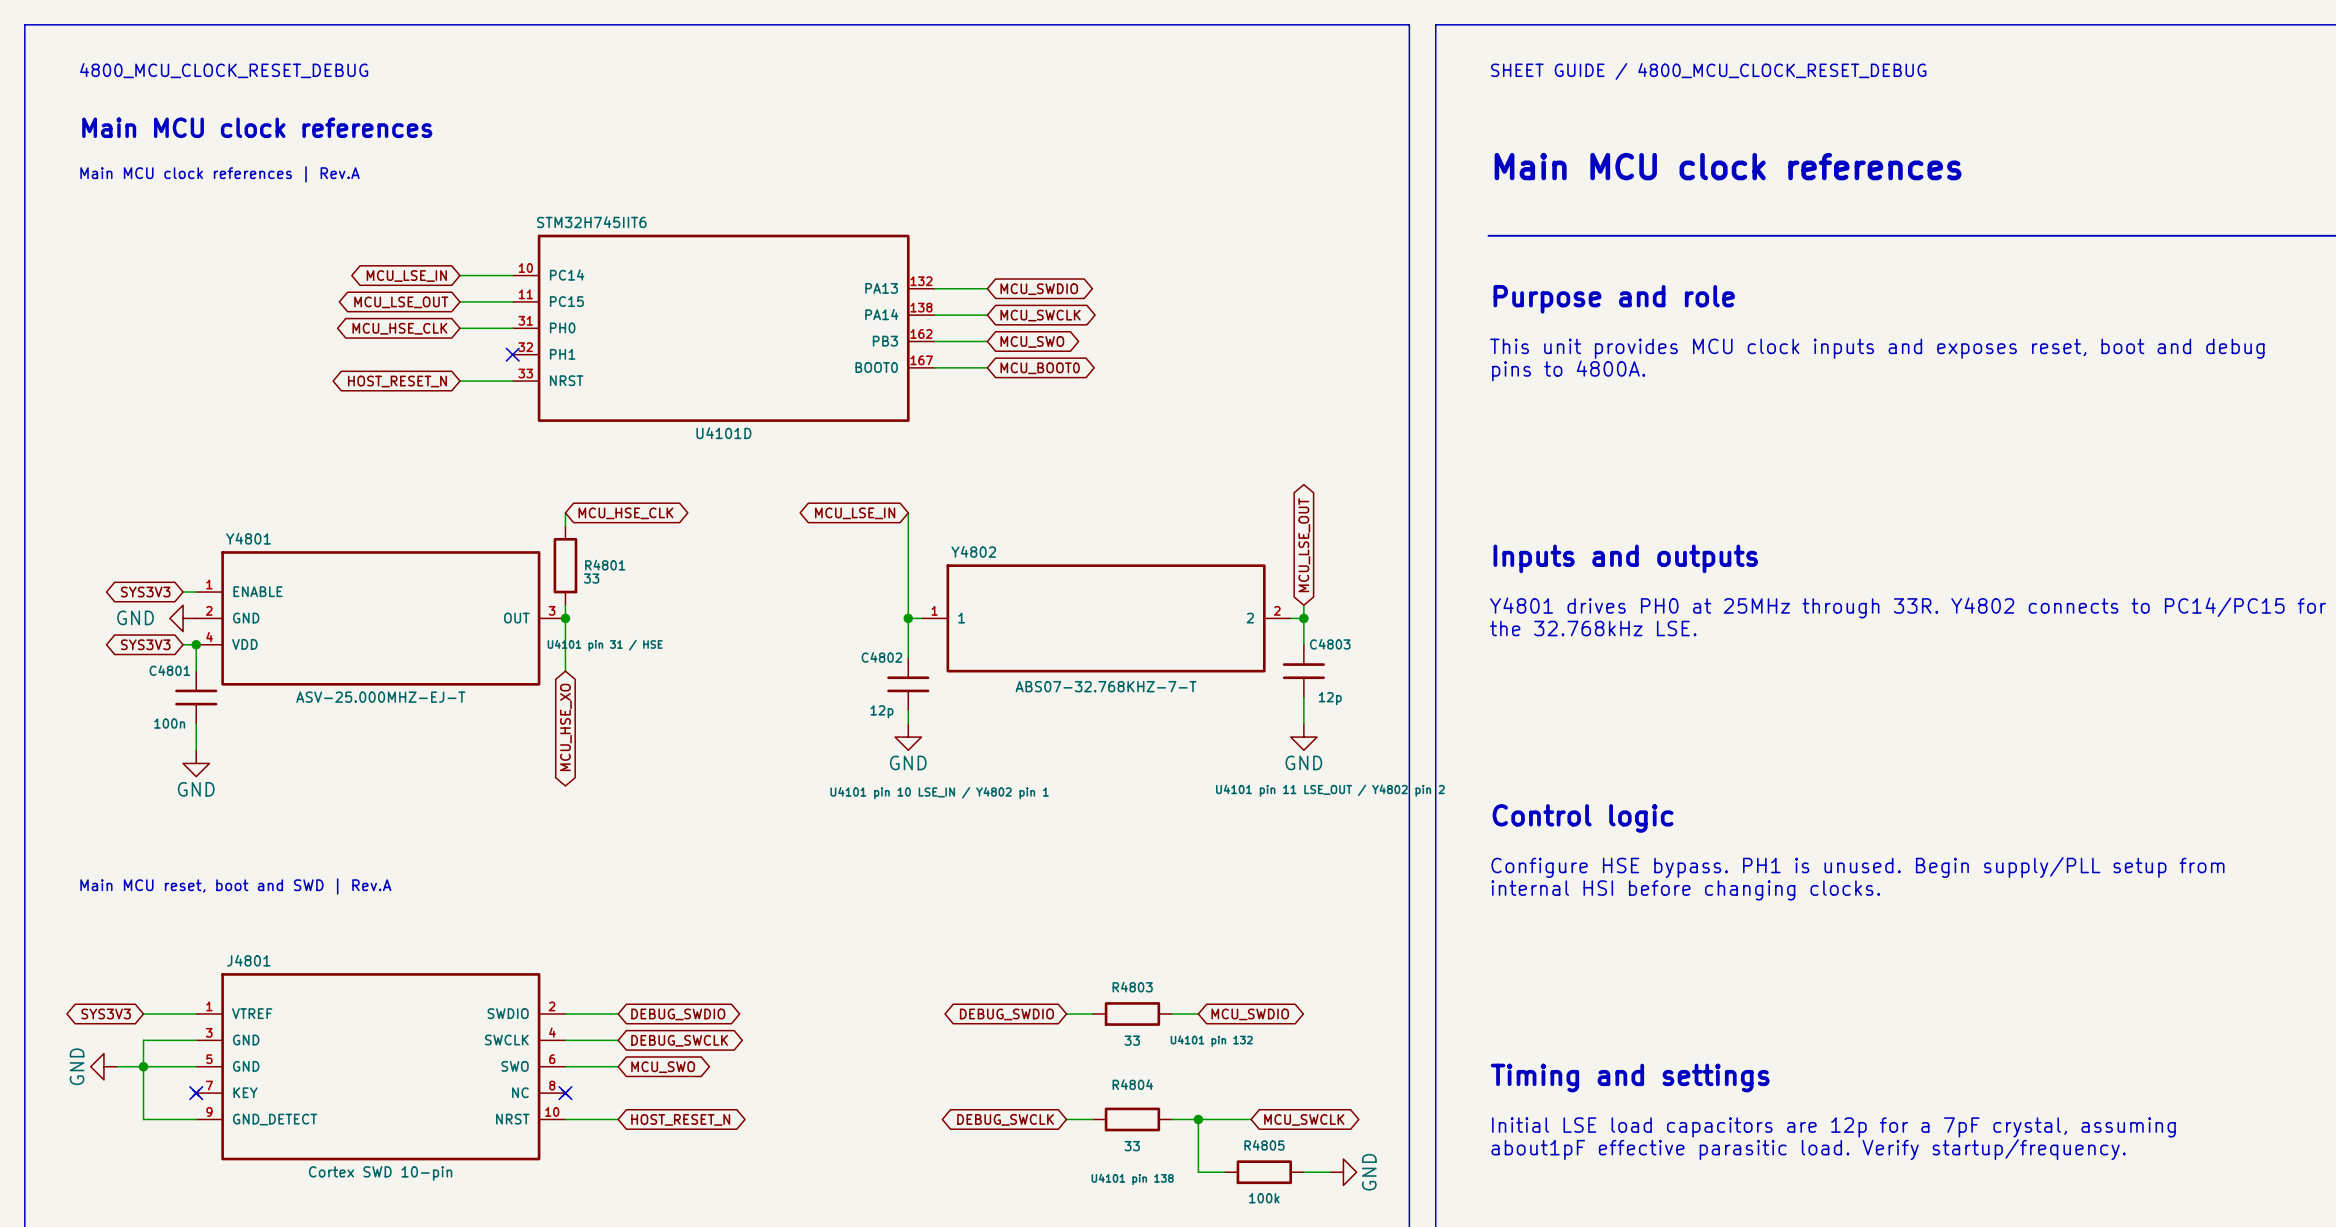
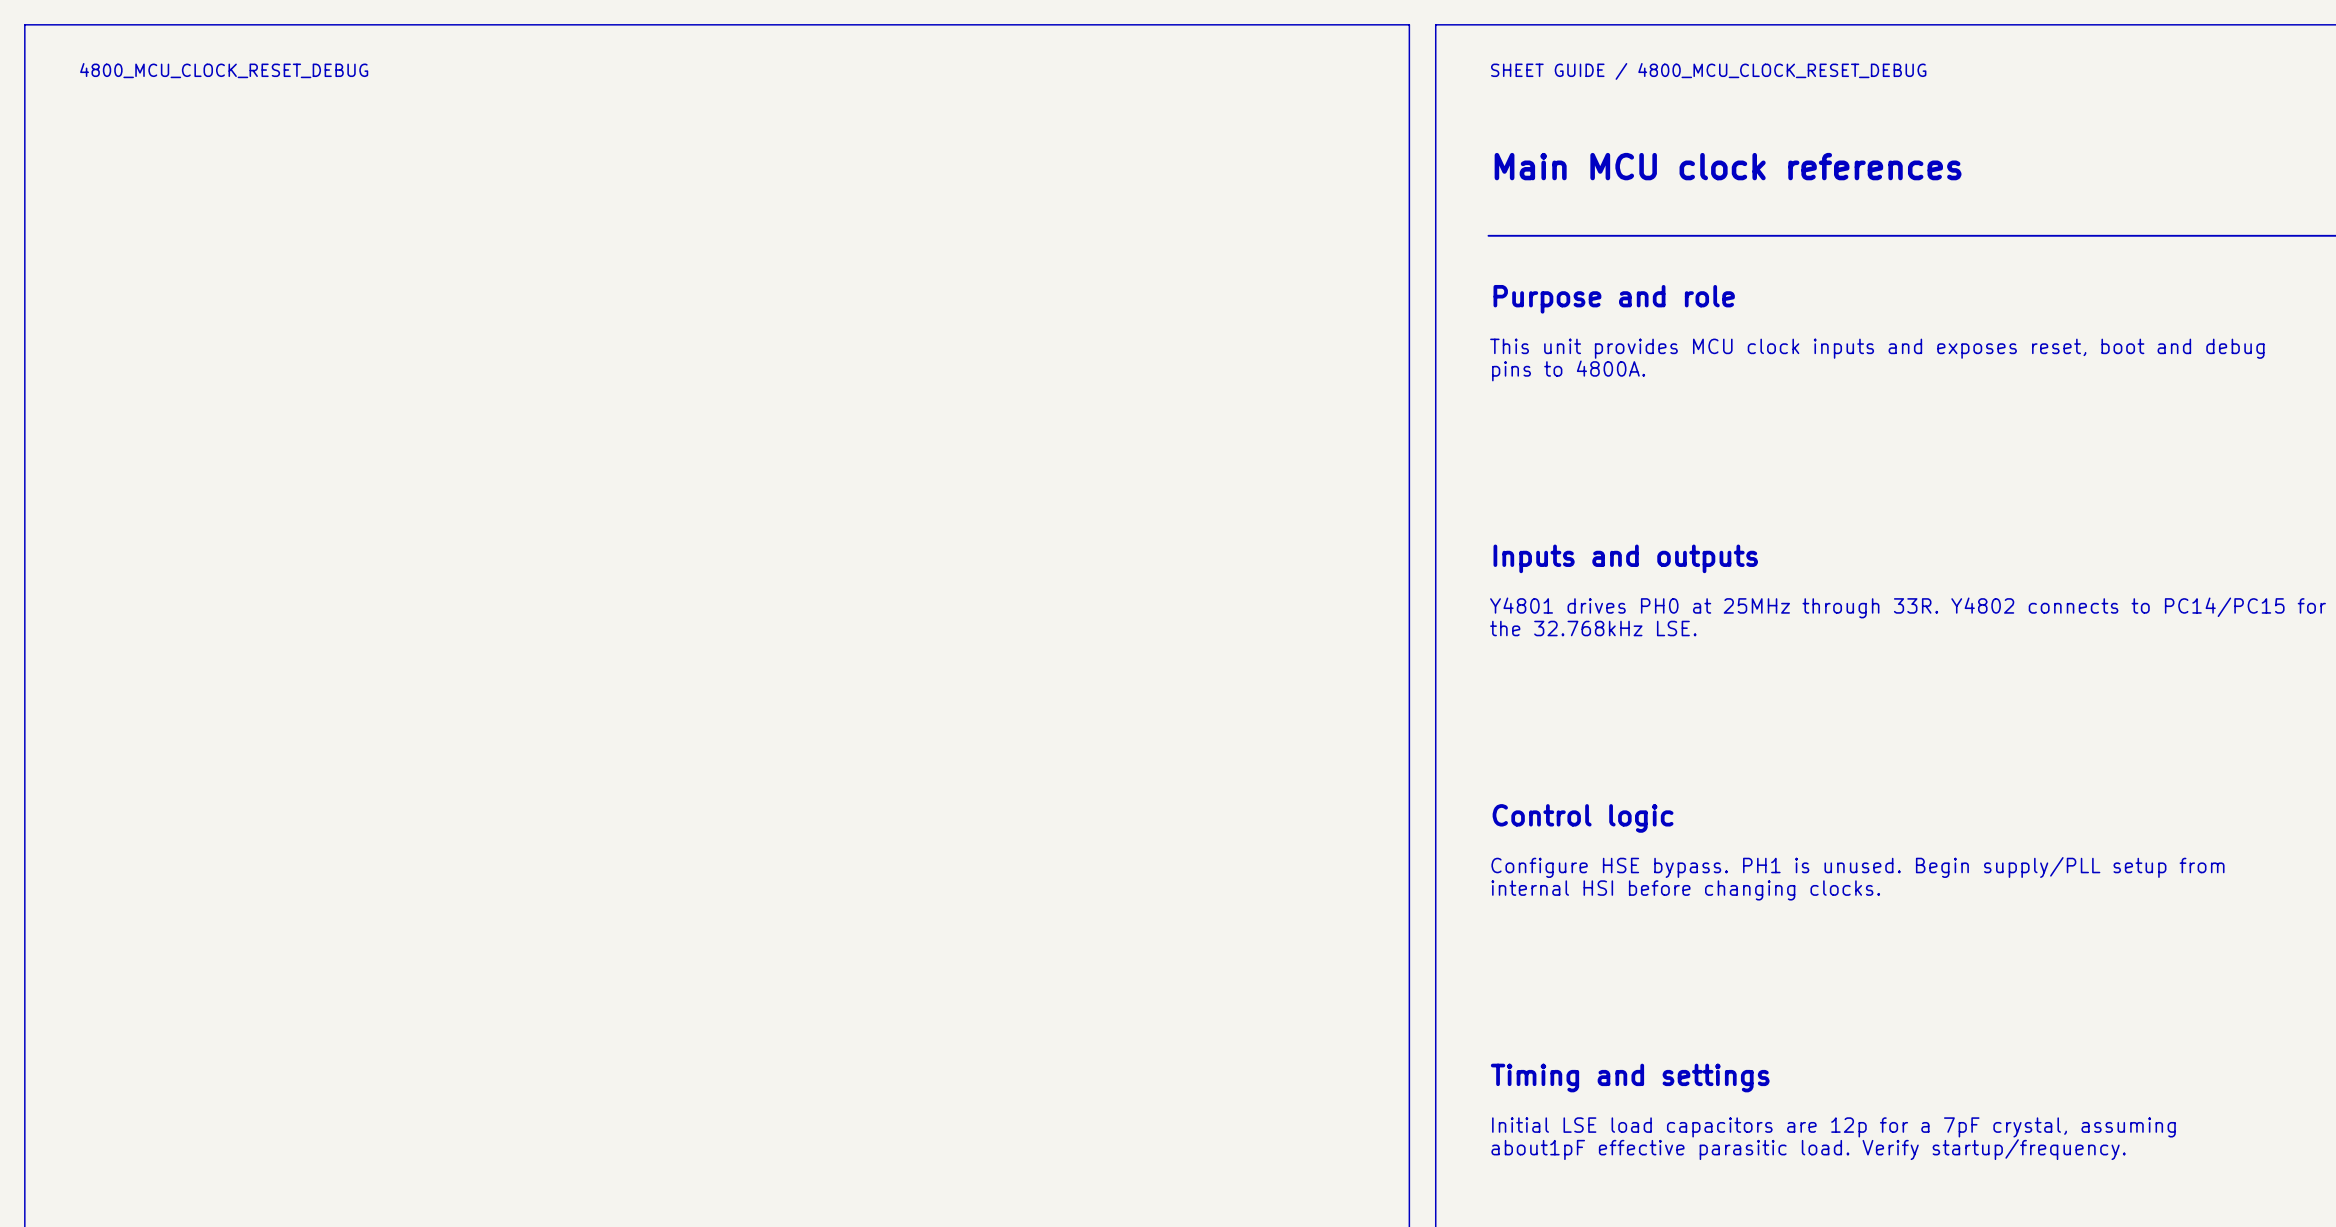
text: Main MCU clock references (257, 127) -> none
text: Main MCU clock references | Rev.A (220, 174) -> none
wire: (459, 275) (512, 275) -> none
global label: MCU_LSE_IN (406, 276) -> none
wire: (934, 288) (987, 288) -> none
global label: MCU_SWDIO (1039, 289) -> none
wire: (459, 301) (512, 301) -> none
global label: MCU_LSE_OUT (401, 302) -> none
wire: (934, 315) (987, 315) -> none
global label: MCU_SWCLK (1040, 315) -> none
global label: MCU_HSE_CLK (399, 328) -> none
wire: (459, 328) (512, 328) -> none
U4101D: STM32H745IIT6 (723, 328) -> none
wire: (934, 341) (987, 341) -> none
global label: MCU_SWO (1032, 341) -> none
no-connect mark: (512, 354) -> none
wire: (934, 367) (987, 367) -> none
global label: MCU_BOOT0 (1040, 368) -> none
global label: HOST_RESET_N (397, 381) -> none
wire: (459, 381) (512, 381) -> none
wire: (565, 512) (565, 526) -> none
wire: (908, 512) (908, 657) -> none
global label: MCU_HSE_CLK (625, 513) -> none
global label: MCU_LSE_IN (855, 513) -> none
global label: MCU_LSE_OUT (1304, 545) -> none
R4801: 33 (565, 565) -> none
global label: SYS3V3 (145, 592) -> none
wire: (183, 592) (196, 592) -> none
wire: (565, 605) (565, 671) -> none
wire: (1303, 605) (1303, 644) -> none
power symbol: GND (183, 618) -> none
Y4801: ASV-25.000MHZ-EJ-T (380, 618) -> none
junction: (565, 618) -> none
wire: (908, 618) (921, 618) -> none
junction: (908, 618) -> none
Y4802: ABS07-32.768KHZ-7-T (1106, 618) -> none
wire: (1290, 618) (1303, 618) -> none
junction: (1303, 618) -> none
global label: SYS3V3 (145, 644) -> none
wire: (183, 644) (196, 644) (196, 671) -> none
junction: (196, 644) -> none
C4803: 12p (1303, 671) -> none
C4802: 12p (908, 684) -> none
C4801: 100n (196, 697) -> none
wire: (1303, 697) (1303, 723) -> none
wire: (908, 710) (908, 723) -> none
wire: (196, 723) (196, 750) -> none
global label: MCU_HSE_XO (565, 727) -> none
power symbol: GND (908, 737) -> none
power symbol: GND (1303, 737) -> none
power symbol: GND (196, 763) -> none
text: Main MCU reset, boot and SWD | Rev.A (235, 886) -> none
global label: SYS3V3 (106, 1013) -> none
wire: (143, 1013) (196, 1013) -> none
wire: (565, 1013) (618, 1013) -> none
wire: (1066, 1013) (1092, 1013) -> none
R4803: 33 (1132, 1013) -> none
wire: (1172, 1013) (1198, 1013) -> none
global label: DEBUG_SWDIO (678, 1014) -> none
global label: DEBUG_SWDIO (1006, 1014) -> none
global label: MCU_SWDIO (1250, 1014) -> none
wire: (196, 1040) (143, 1040) (143, 1119) (196, 1119) -> none
wire: (565, 1040) (618, 1040) -> none
global label: DEBUG_SWCLK (679, 1040) -> none
power symbol: GND (103, 1066) -> none
wire: (117, 1066) (196, 1066) -> none
junction: (143, 1066) -> none
J4801: Cortex SWD 10-pin (380, 1066) -> none
wire: (565, 1066) (618, 1066) -> none
global label: MCU_SWO (663, 1067) -> none
no-connect mark: (196, 1093) -> none
no-connect mark: (565, 1093) -> none
wire: (565, 1119) (618, 1119) -> none
global label: HOST_RESET_N (680, 1119) -> none
global label: DEBUG_SWCLK (1005, 1119) -> none
wire: (1066, 1119) (1092, 1119) -> none
R4804: 33 (1132, 1119) -> none
wire: (1172, 1119) (1251, 1119) -> none
wire: (1198, 1119) (1198, 1172) (1224, 1172) -> none
junction: (1198, 1119) -> none
global label: MCU_SWCLK (1304, 1119) -> none
R4805: 100k (1264, 1172) -> none
wire: (1303, 1172) (1330, 1172) -> none
power symbol: GND (1343, 1172) -> none

